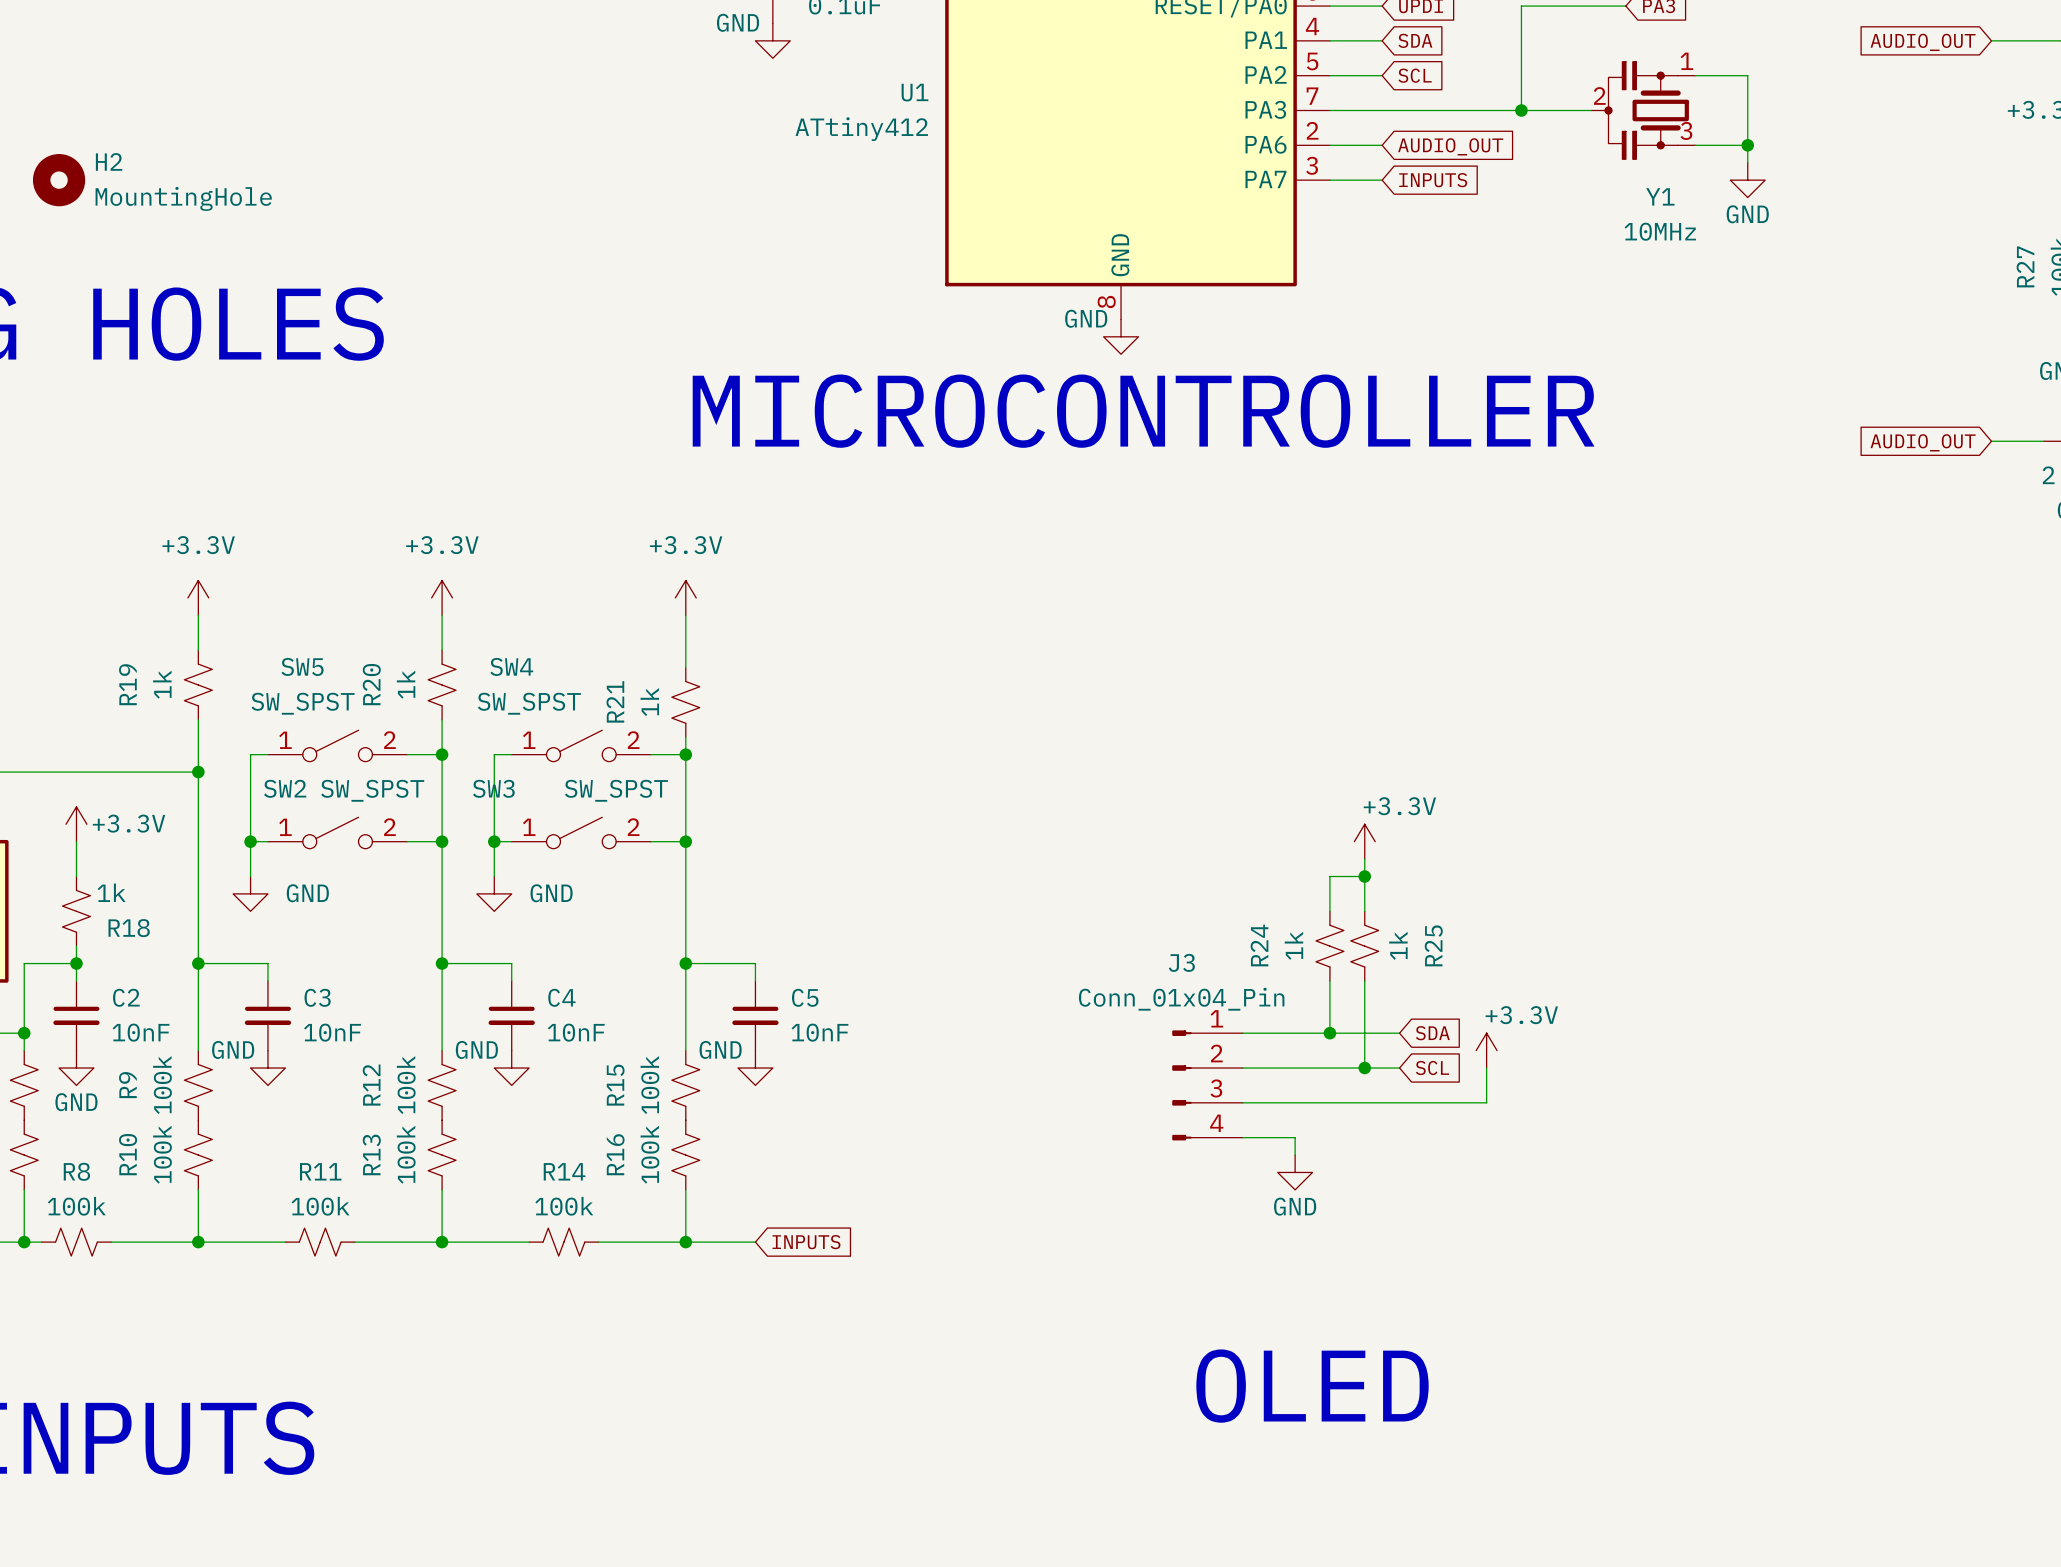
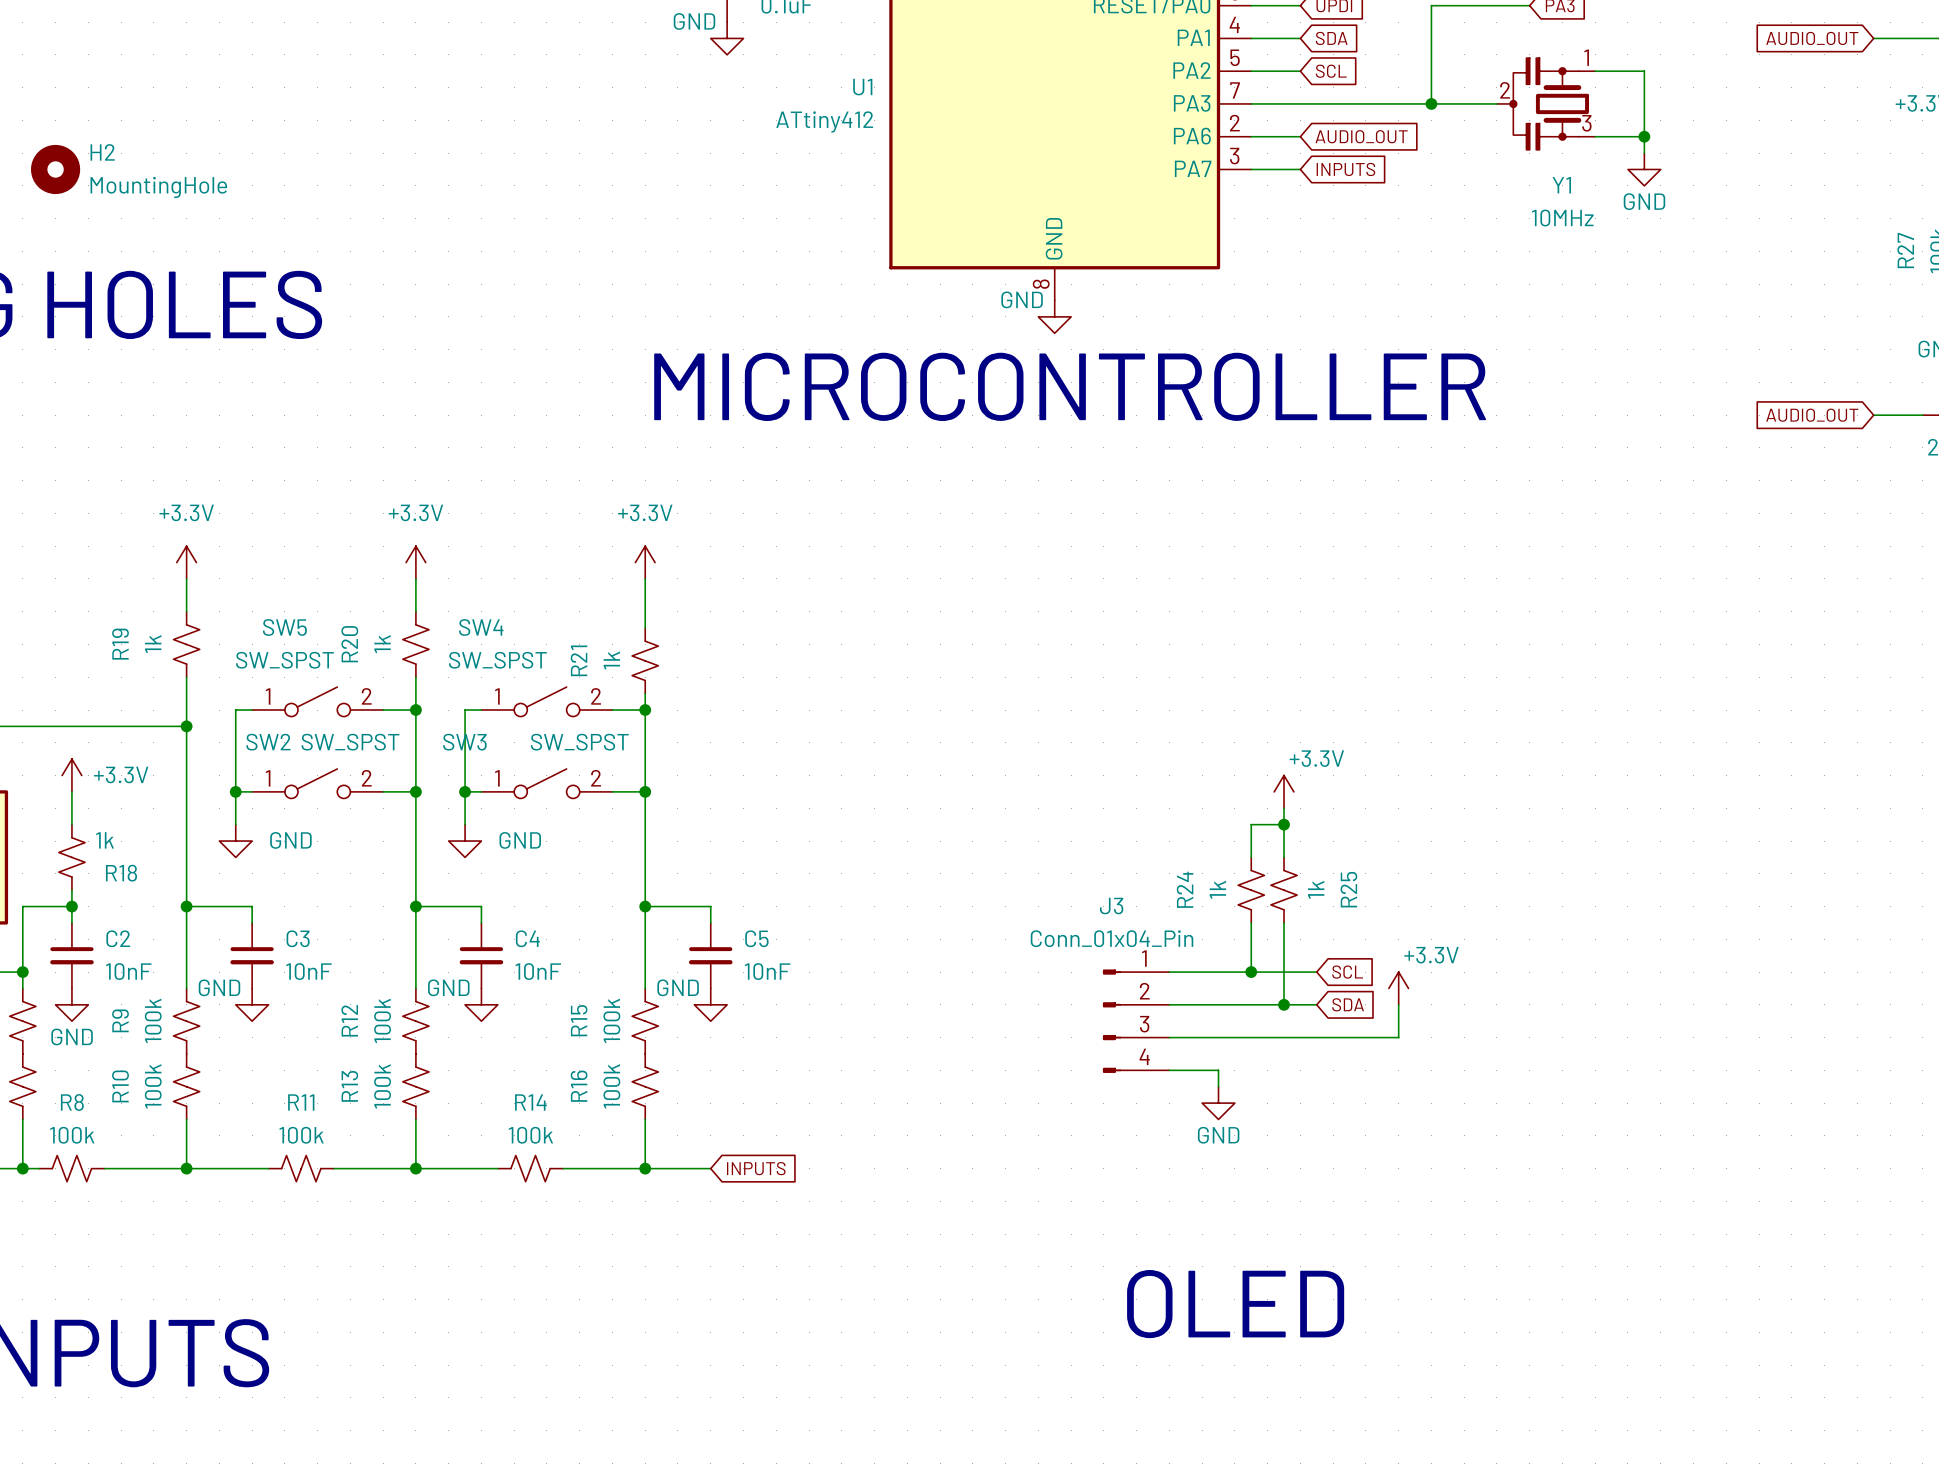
global label: SDA (1432, 1033) -> SCL (1347, 972)
global label: SCL (1432, 1068) -> SDA (1348, 1004)

